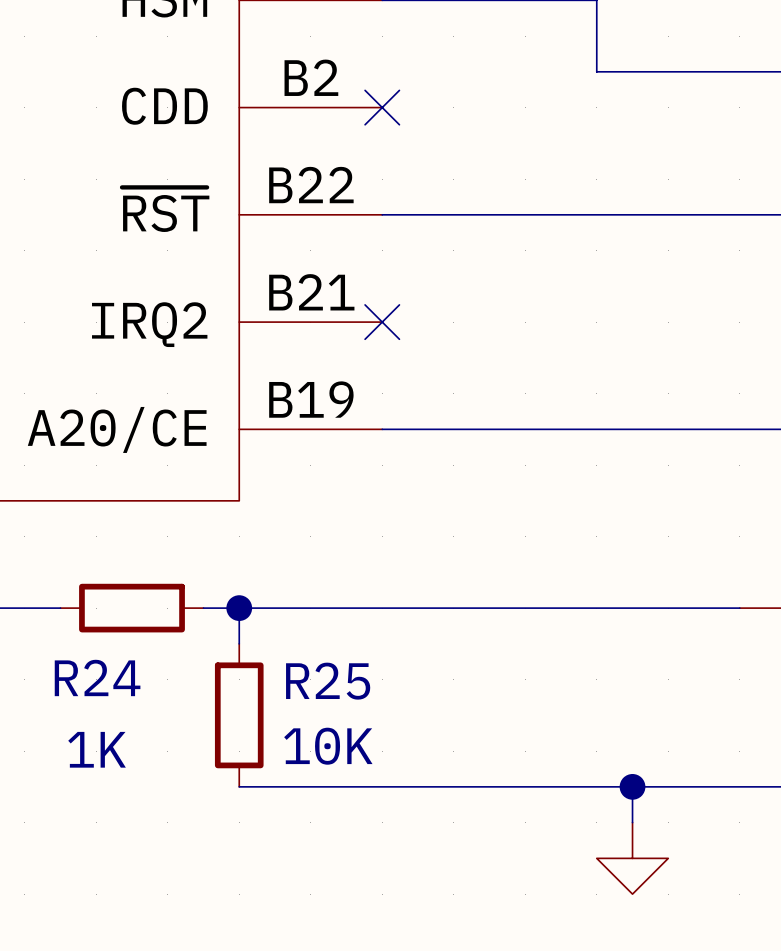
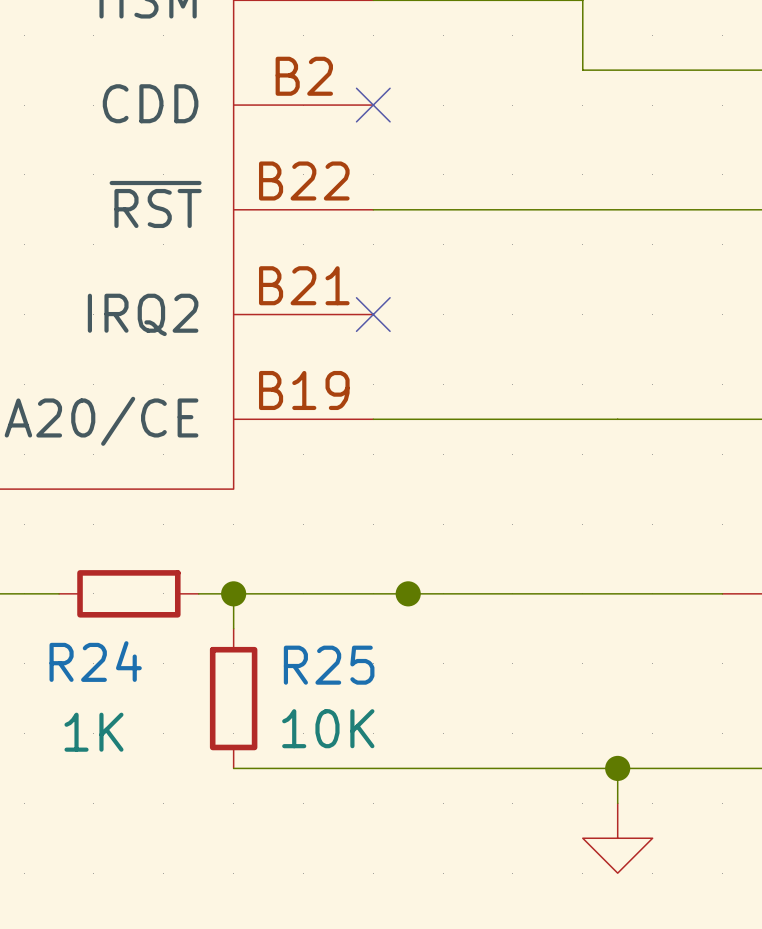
junction: none -> (408, 593)

